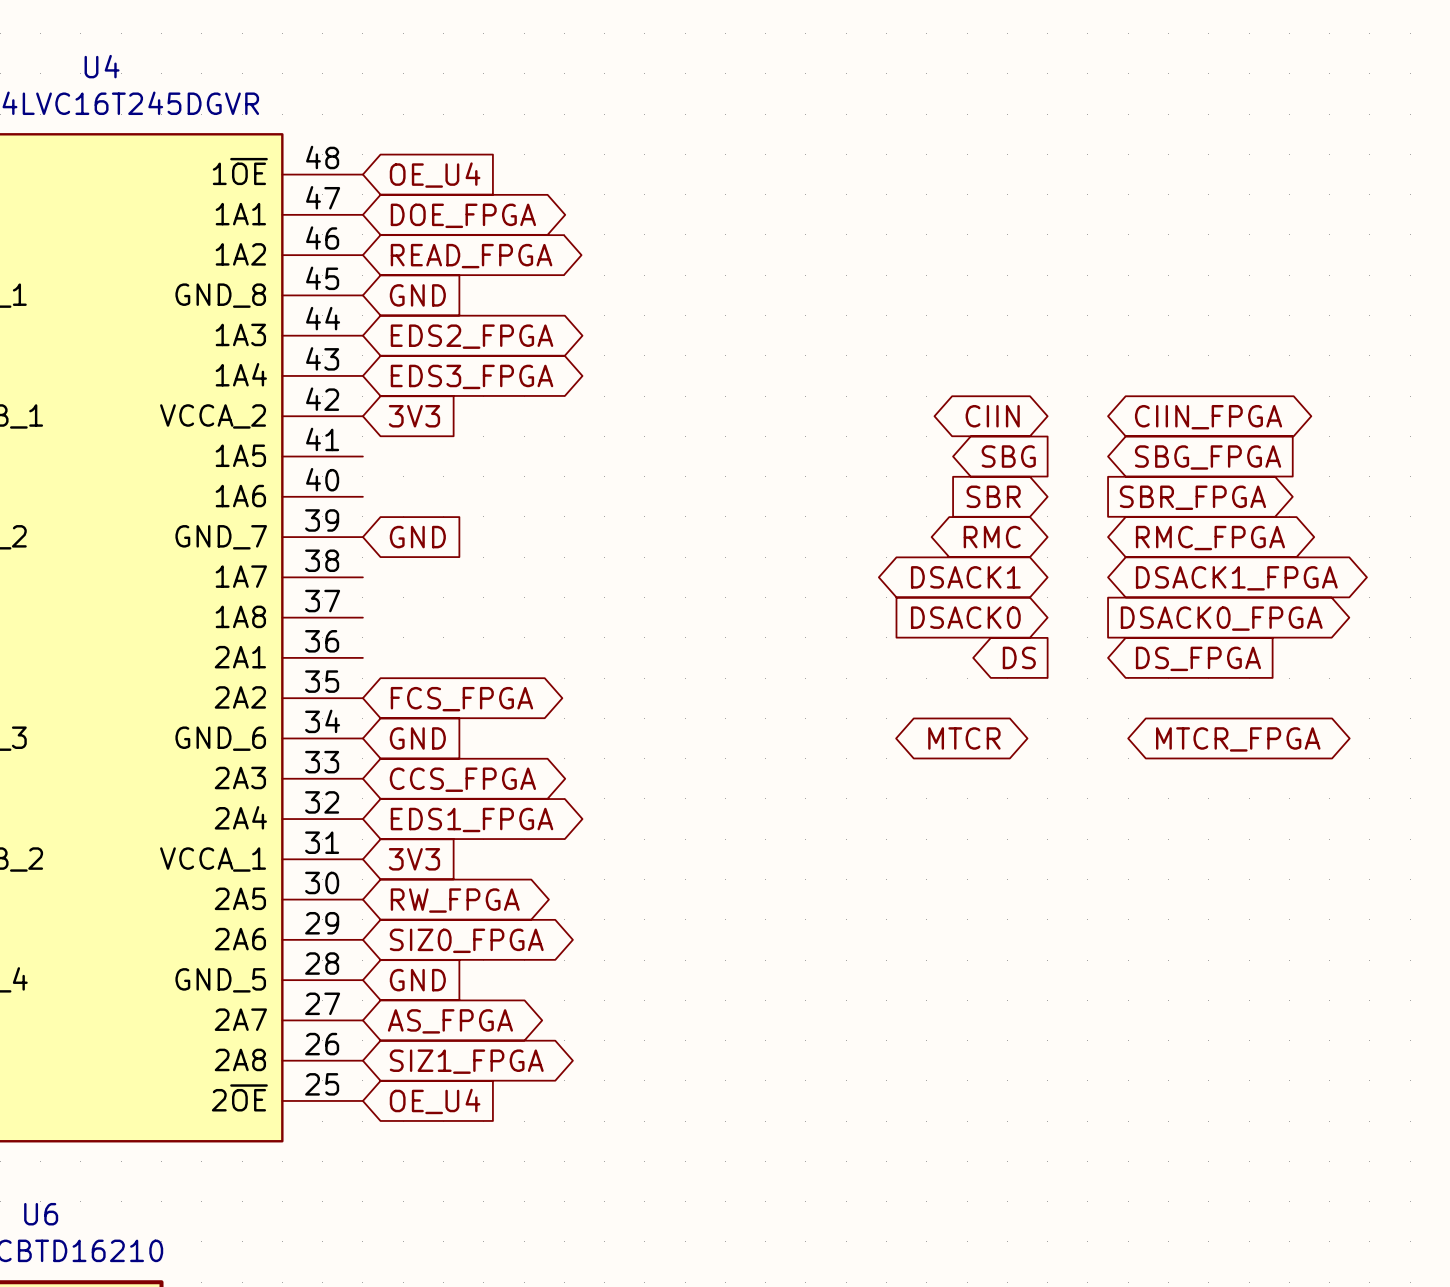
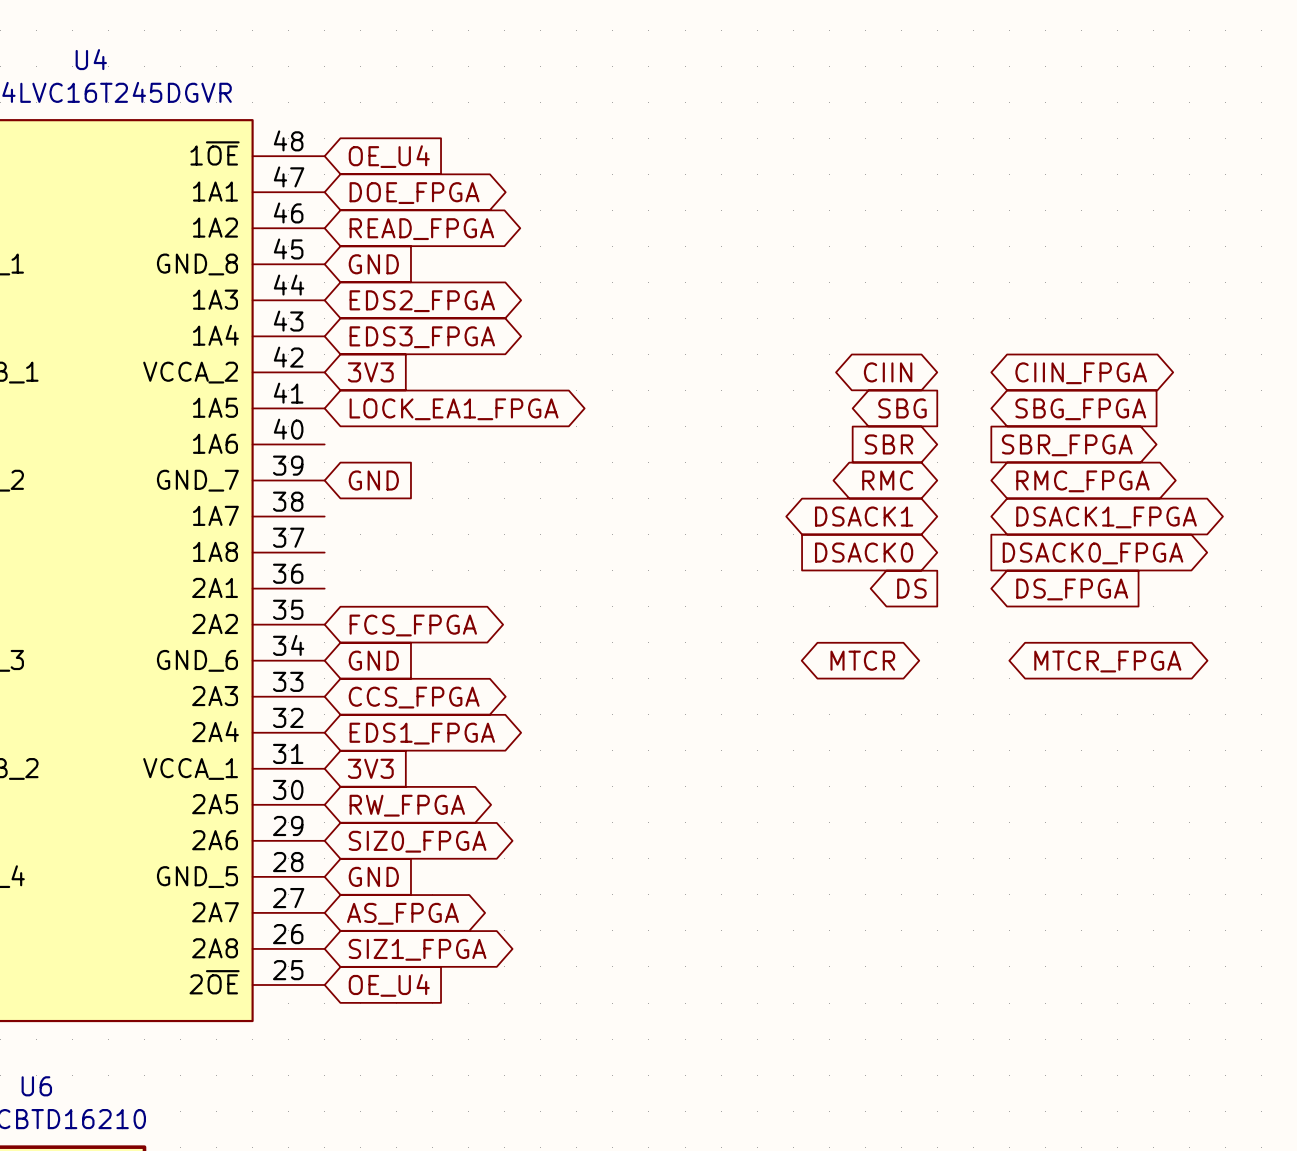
global label: none -> LOCK_EA1_FPGA (454, 409)

